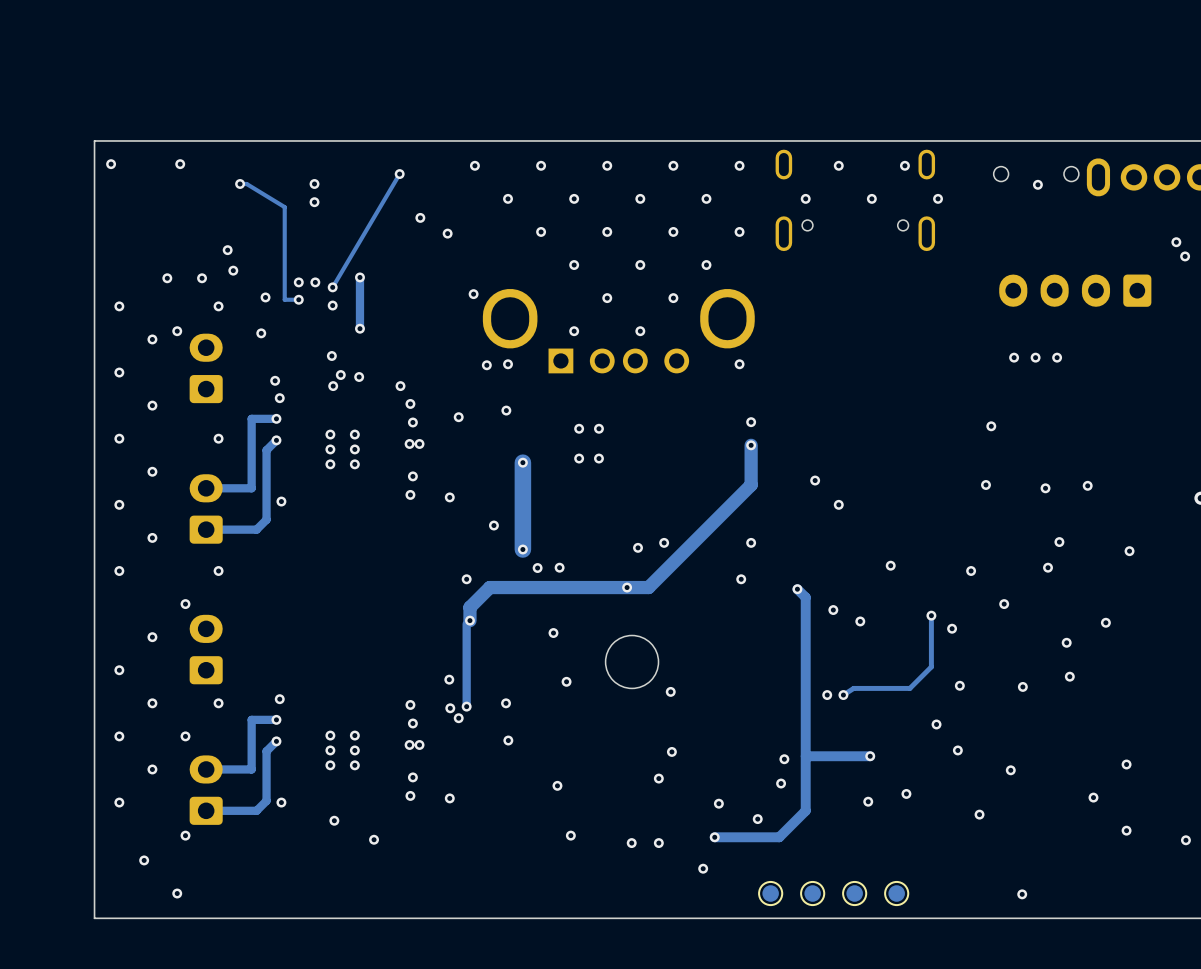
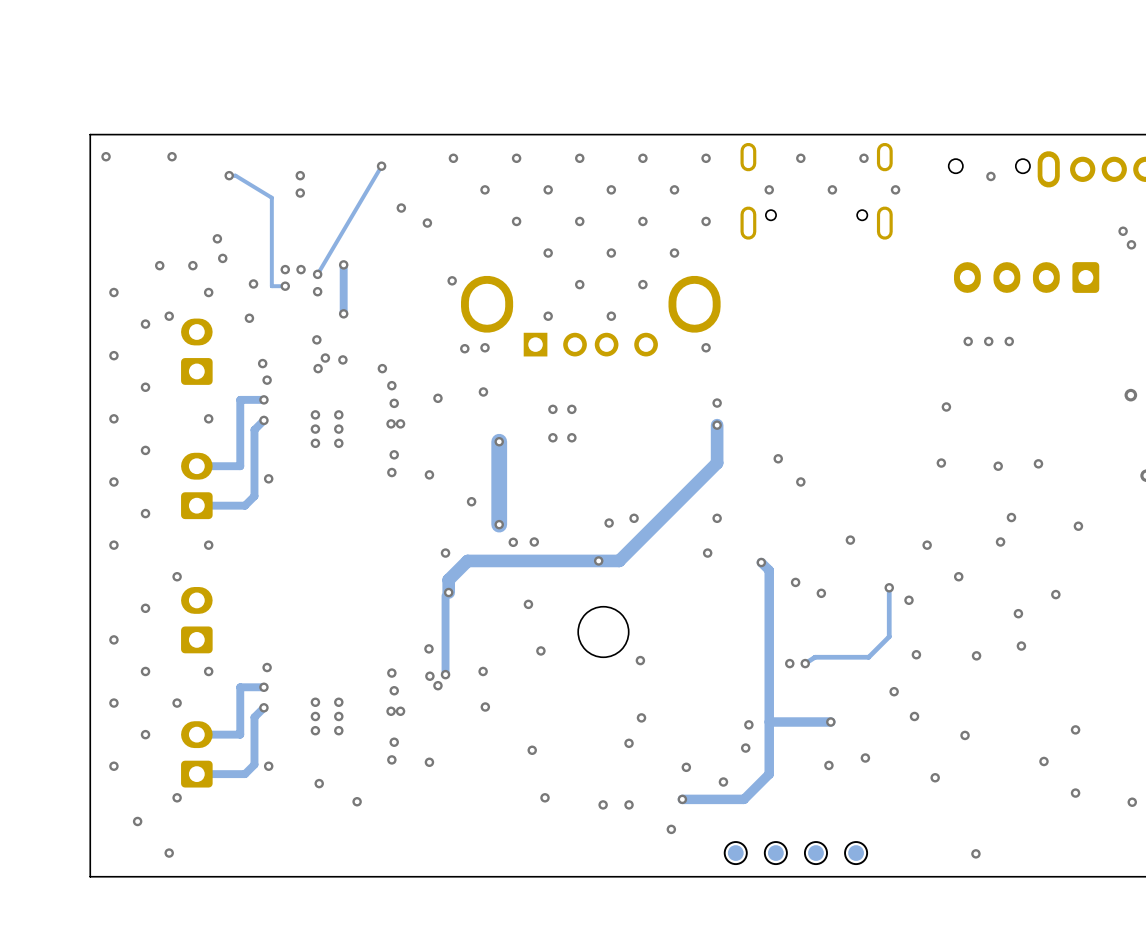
via: none -> (1130, 395)

